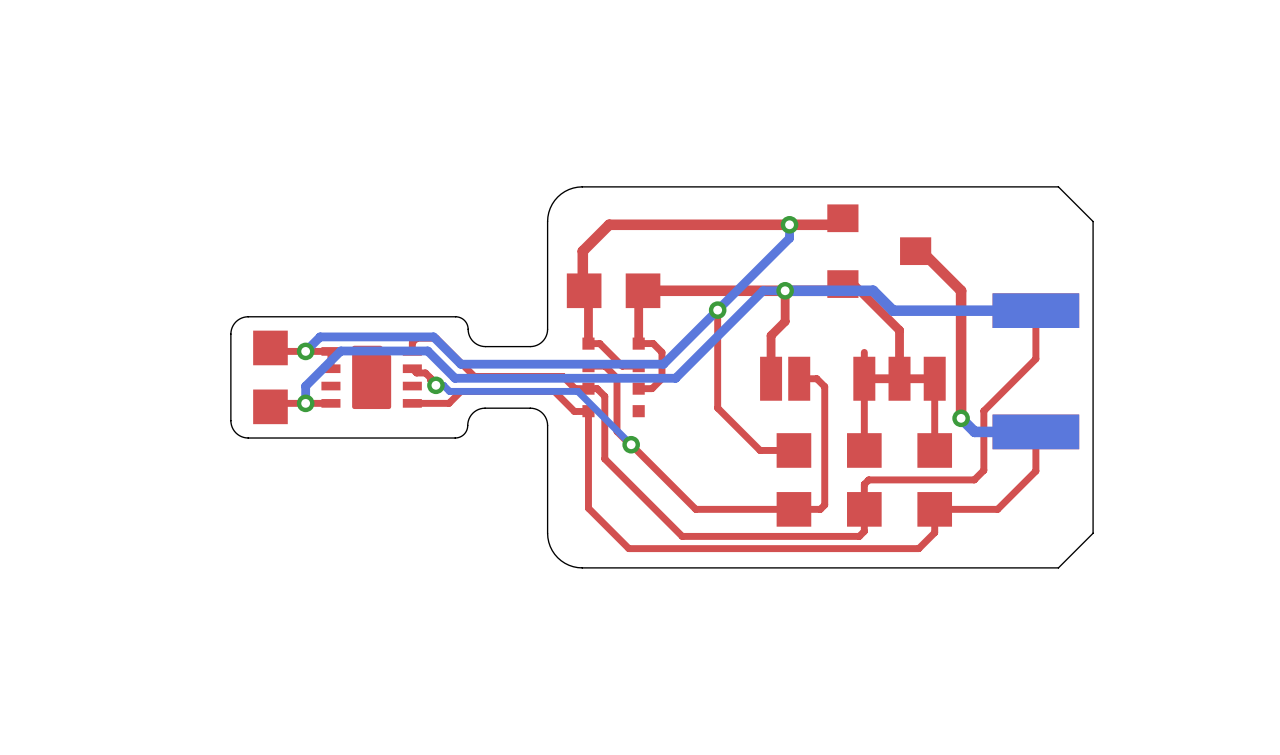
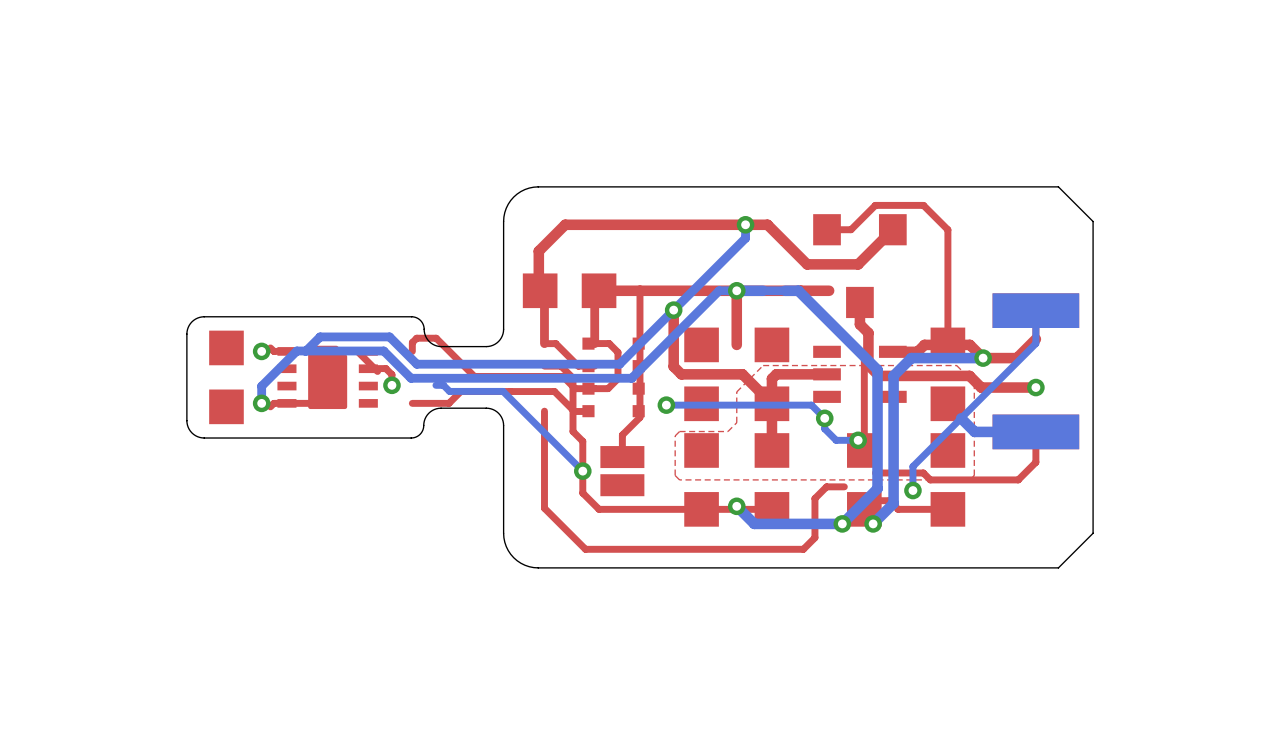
board edge: (582, 186) (568, 189) (561, 194) (554, 200) (548, 212) (547, 329) (545, 337) (540, 343) (532, 346) (486, 346) -> (582, 186) (529, 188) (517, 194) (508, 204) (503, 221) (503, 331) (498, 341) (486, 346)
top track: (842, 218) (840, 224) (767, 224) -> (892, 229) (858, 264) (807, 264) (767, 224)
top track: (609, 224) (582, 251) (582, 289) (588, 295) (588, 343) (599, 343) (622, 366) (638, 366) -> (609, 224) (565, 224) (538, 251) (538, 289) (544, 295) (544, 343) (555, 343) (578, 366) (588, 366)
via: none -> (745, 224)
bottom track: (789, 224) (789, 238) (663, 364) (619, 364) -> (745, 224) (745, 238) (619, 364)
via: (789, 224) -> none
top track: none -> (827, 229) (851, 229) (875, 205) (923, 205) (947, 229) (947, 344)
part rotation: 0° (879, 251) -> 90° clockwise (859, 266)
top track: (915, 251) (921, 251) (961, 290) (961, 418) -> none
top track: (841, 277) (842, 284) (853, 284) (899, 330) (899, 378) -> none
part position: (613, 290) -> (569, 290)
top track: none -> (639, 290) (639, 417) (622, 435) (622, 457)
top track: (643, 290) (638, 295) (638, 343) -> (643, 290) (599, 290) (594, 295) (594, 343)
top track: none -> (736, 290) (736, 344)
via: none -> (736, 290)
bottom track: (763, 290) (675, 378) (631, 378) -> (763, 290) (719, 290) (631, 378)
top track: (785, 290) (785, 321) (771, 335) (771, 378) -> none
via: (785, 290) -> none
bottom track: (798, 290) (873, 290) (893, 310) (1035, 310) -> (798, 290) (877, 369) (877, 488) (842, 523) (754, 523) (736, 506)
top track: none -> (859, 302) (859, 324) (868, 332) (868, 365) (879, 375) (969, 375) (981, 387) (1035, 387)
top track: none -> (673, 310) (673, 366) (681, 374) (742, 374) (771, 403)
via: none -> (673, 310)
top track: (717, 310) (717, 408) (760, 450) (793, 450) -> none
via: (717, 310) -> none
board edge: (248, 316) (235, 321) (230, 334) (231, 422) (235, 432) (248, 438) -> (248, 316) (199, 317) (190, 323) (186, 334) (186, 420) (189, 429) (193, 434) (201, 437) (248, 438)
board edge: (411, 316) (460, 317) (466, 323) (471, 339) (476, 344) (485, 346) -> (411, 316) (421, 321) (426, 337) (434, 345) (485, 346)
bottom track: none -> (1035, 316) (1035, 343) (912, 466) (912, 490)
bottom track: (389, 336) (433, 336) (460, 364) -> (389, 336) (416, 364) (460, 364)
top track: (1035, 339) (1035, 358) (983, 410) (983, 470) (974, 479) -> (1035, 339) (1016, 358) (983, 358) (969, 344) (924, 344) (917, 351) (892, 351)
top track: none -> (594, 343) (609, 343) (617, 352) (617, 378) (608, 388) (597, 388)
top track: (638, 343) (653, 343) (661, 352) (661, 378) (652, 388) (637, 387) -> none
via: none -> (261, 351)
via: (305, 351) -> none
bottom track: (340, 351) (305, 386) (305, 403) -> (340, 351) (296, 351) (261, 386) (261, 403)
bottom track: (383, 351) (427, 351) (455, 378) -> (383, 351) (411, 378) (455, 378)
part footprint: [760, 356, 811, 401] -> [754, 327, 790, 422]
bottom track: none -> (983, 358) (911, 358) (893, 375) (893, 503) (873, 523)
via: none -> (983, 358)
top zone outline: none -> (956, 365) (974, 383) (974, 475) (969, 479) (679, 479) (675, 475) (675, 435) (679, 431) (727, 431) (736, 422) (736, 391) (763, 365) (956, 365)
top track: (594, 366) (605, 366) (616, 378) (616, 431) (695, 509) -> (544, 366) (561, 366) (573, 378) (573, 431) (582, 441) (582, 493) (599, 509) (695, 509)
top track: none -> (368, 368) (385, 368) (391, 374) (391, 385)
top track: (412, 368) (416, 372) (425, 372) (435, 385) -> none
part: none -> (701, 374)
top track: none -> (827, 374) (776, 374) (771, 378) (771, 450)
part: none -> (859, 374)
part: none -> (947, 374)
part position: (270, 377) -> (226, 377)
part position: (371, 377) -> (327, 377)
top track: (799, 378) (816, 378) (824, 386) (824, 504) (820, 509) (771, 509) -> none
part: (899, 378) -> none
top track: (934, 383) (934, 450) -> none
via: none -> (391, 385)
via: (435, 385) -> none
via: none -> (1035, 387)
top track: (597, 388) (604, 396) (604, 458) (682, 536) (859, 536) (864, 531) (864, 484) (868, 479) (930, 479) -> (875, 472) (923, 472) (930, 479)
bottom track: (503, 391) (577, 391) (631, 444) -> (503, 391) (582, 471)
via: none -> (261, 403)
via: (305, 403) -> none
bottom track: none -> (666, 405) (811, 405) (824, 418) (824, 428) (836, 440) (858, 440)
via: none -> (666, 405)
board edge: (485, 408) (476, 410) (471, 414) (466, 431) (460, 437) (411, 438) -> (485, 408) (434, 409) (426, 416) (421, 433) (411, 438)
board edge: (486, 408) (532, 408) (540, 411) (545, 416) (547, 425) (548, 542) (554, 554) (561, 560) (568, 565) (582, 567) -> (486, 408) (498, 413) (503, 423) (503, 533) (508, 550) (517, 560) (529, 566) (582, 567)
top track: none -> (544, 411) (544, 508) (585, 549) (803, 549) (814, 537) (814, 498) (826, 486) (844, 486)
top track: (588, 411) (588, 508) (628, 548) (918, 548) (934, 532) (934, 509) -> (873, 523) (875, 521) (875, 500) (889, 500) (898, 509) (934, 509)
via: none -> (824, 418)
via: (961, 418) -> none
via: none -> (858, 440)
via: (631, 444) -> none
top track: (1035, 462) (1035, 471) (997, 509) (947, 509) -> (1035, 462) (1018, 479) (974, 479)
via: none -> (582, 471)
part: none -> (622, 471)
part: none -> (701, 479)
part position: (793, 479) -> (771, 479)
part position: (934, 479) -> (947, 479)
via: none -> (912, 490)
via: none -> (736, 506)
via: none -> (842, 523)
via: none -> (873, 523)

